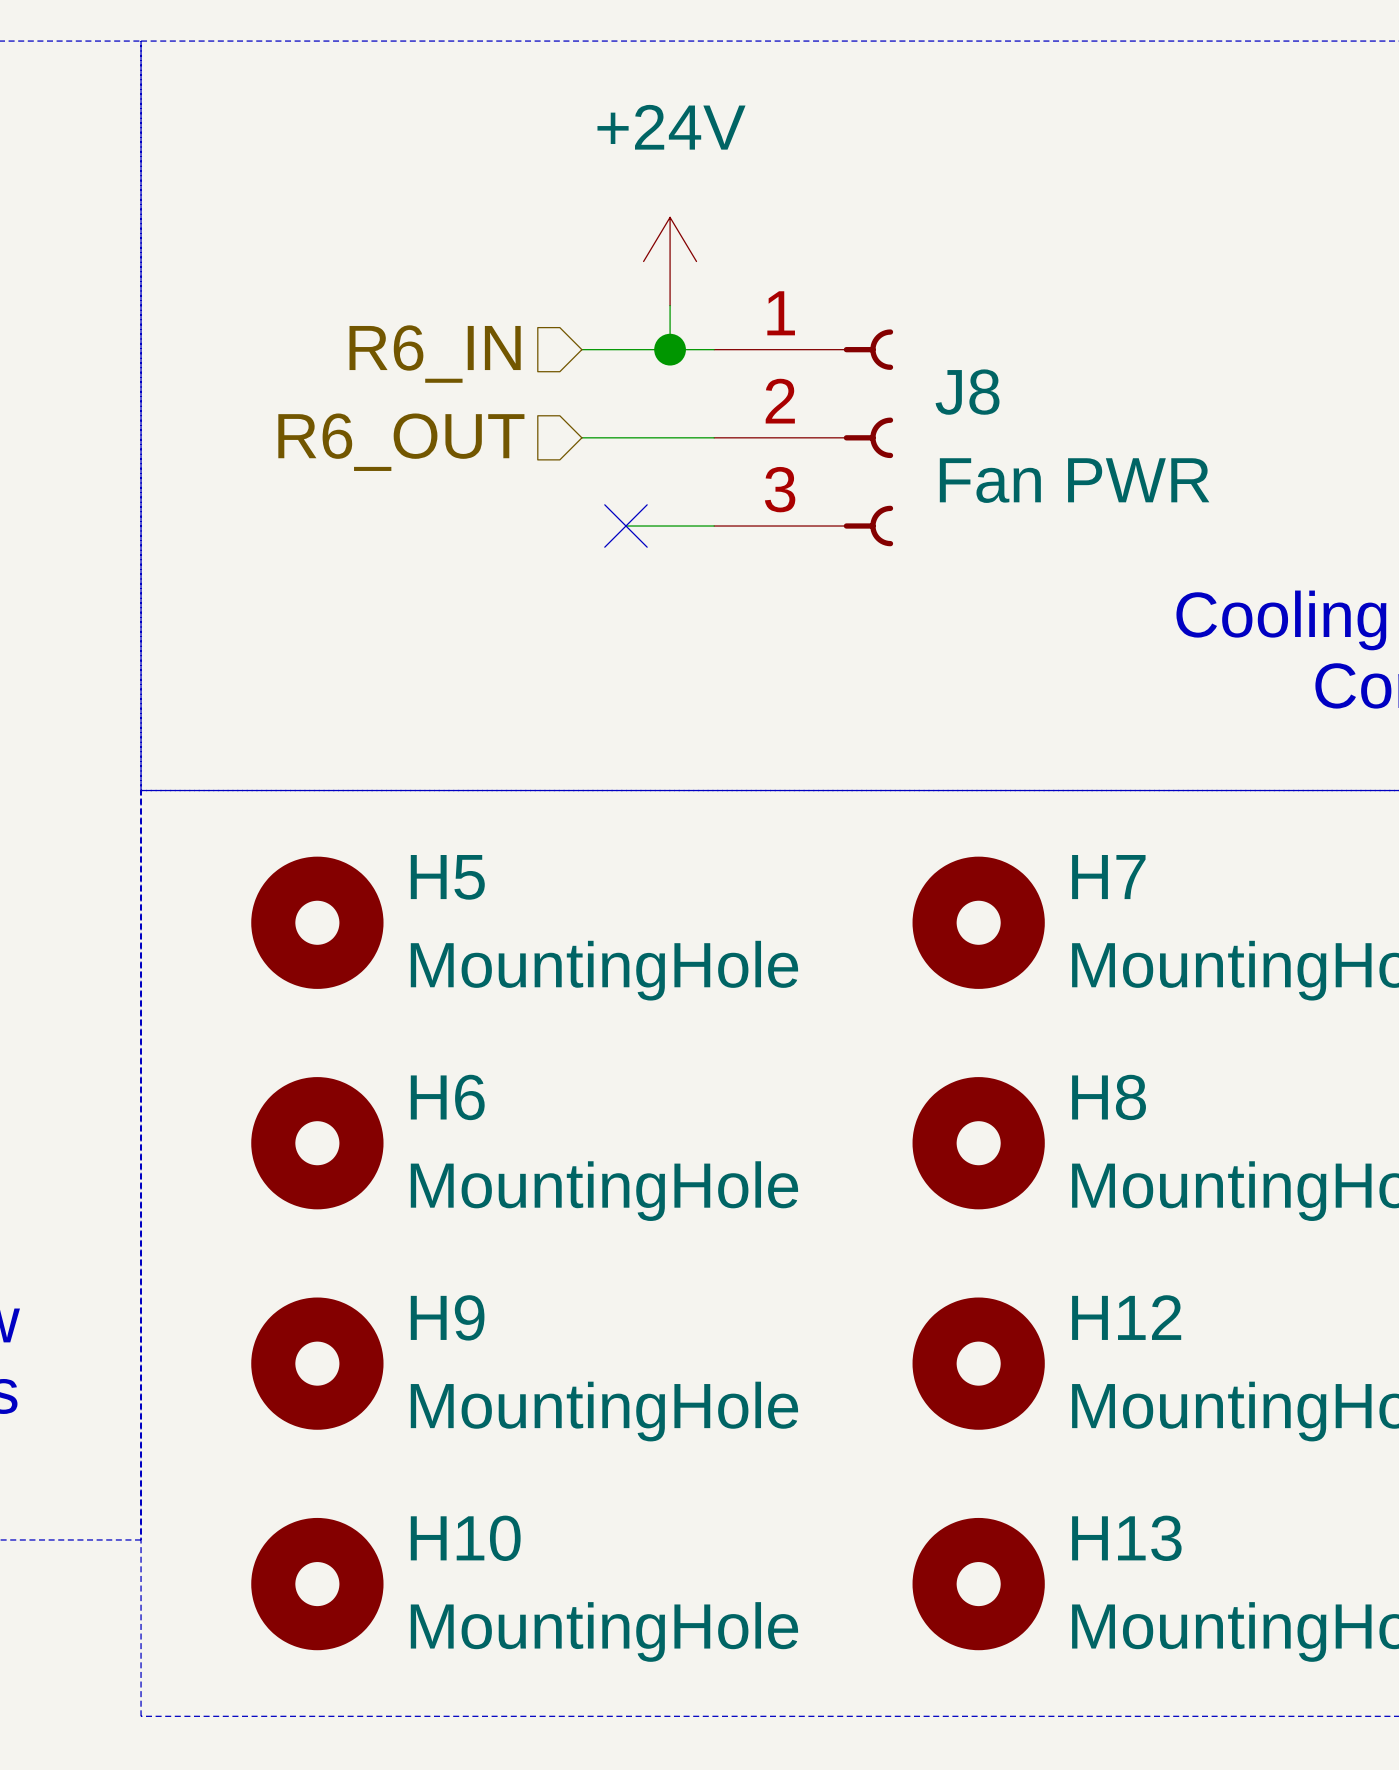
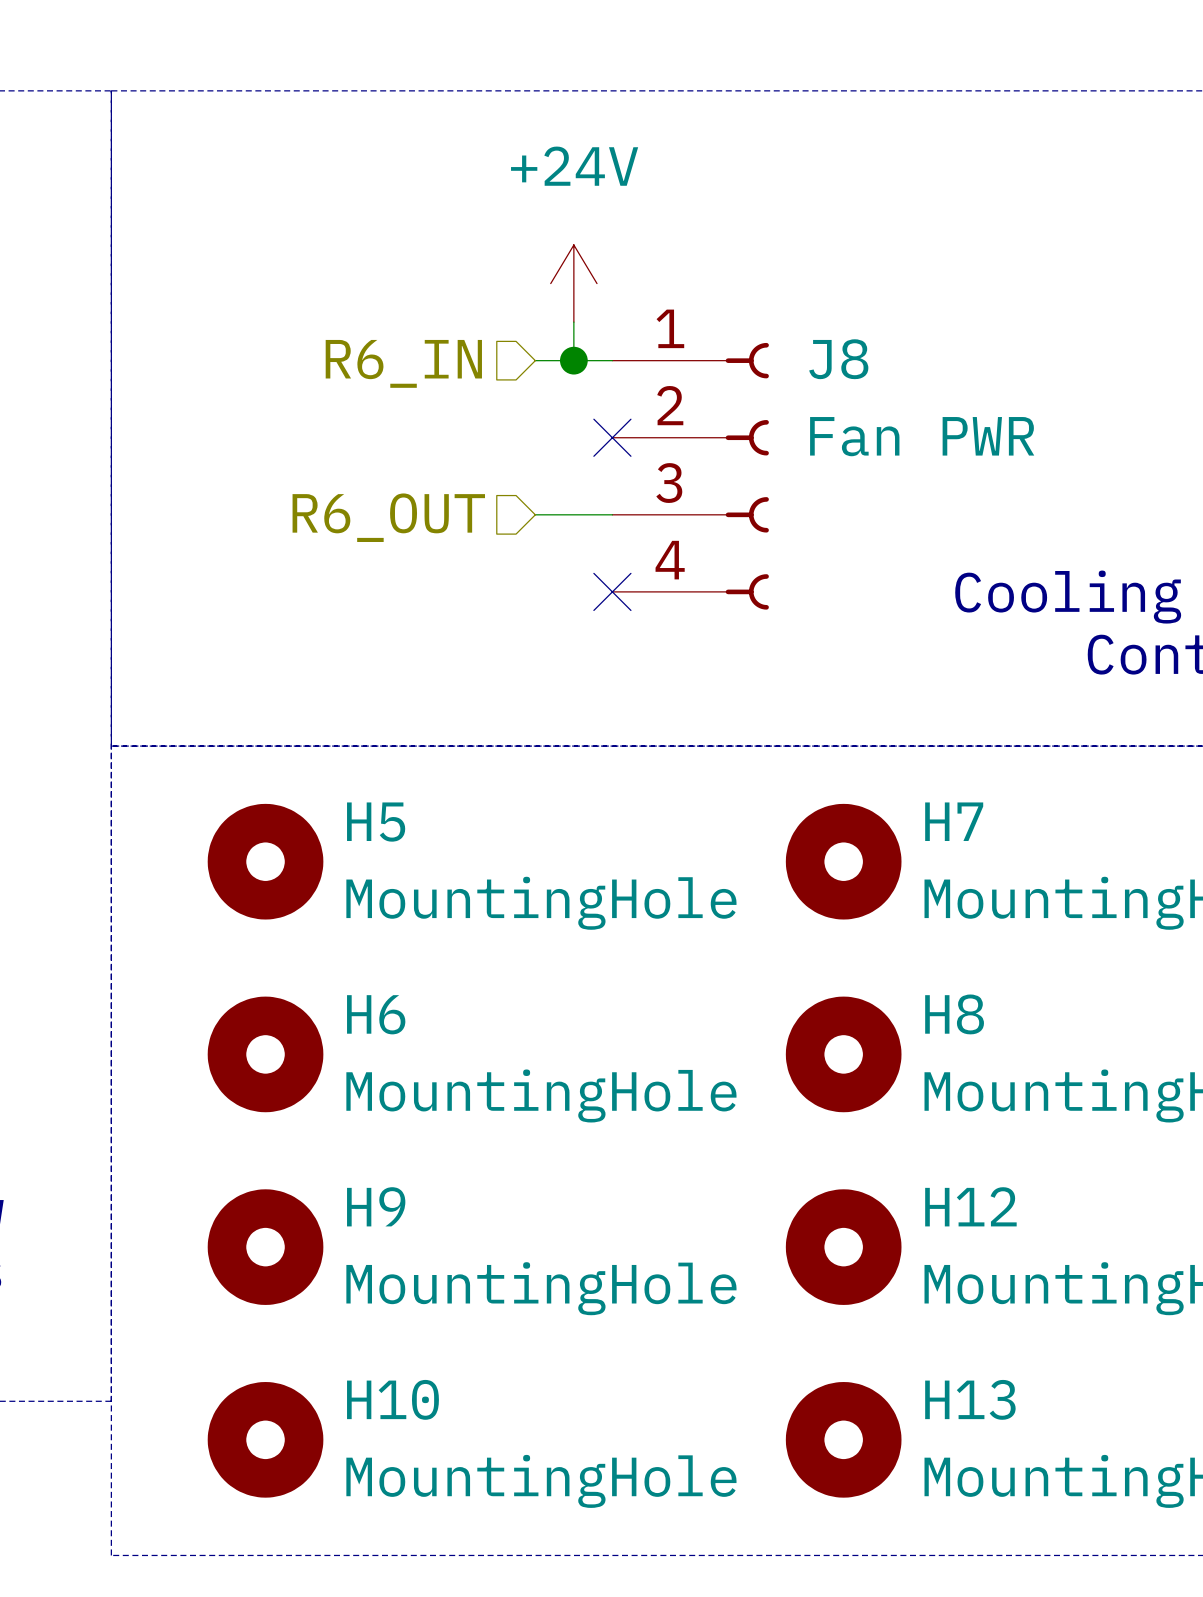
J8 symbol: [714, 329, 894, 547] -> [612, 342, 769, 610]
wire: (581, 349) (625, 349) -> none
hierarchical label position: R6_IN (435, 354) -> R6_IN (403, 363)
J8 name position: J8 (967, 392) -> J8 (838, 359)
wire: (581, 437) (714, 437) -> none
no-connect mark: none -> (612, 437)
hierarchical label position: R6_OUT (401, 442) -> R6_OUT (388, 517)
J8 value position: Fan PWR (1074, 480) -> Fan PWR (922, 436)
no-connect mark: (625, 526) -> none
no-connect mark: none -> (612, 591)

